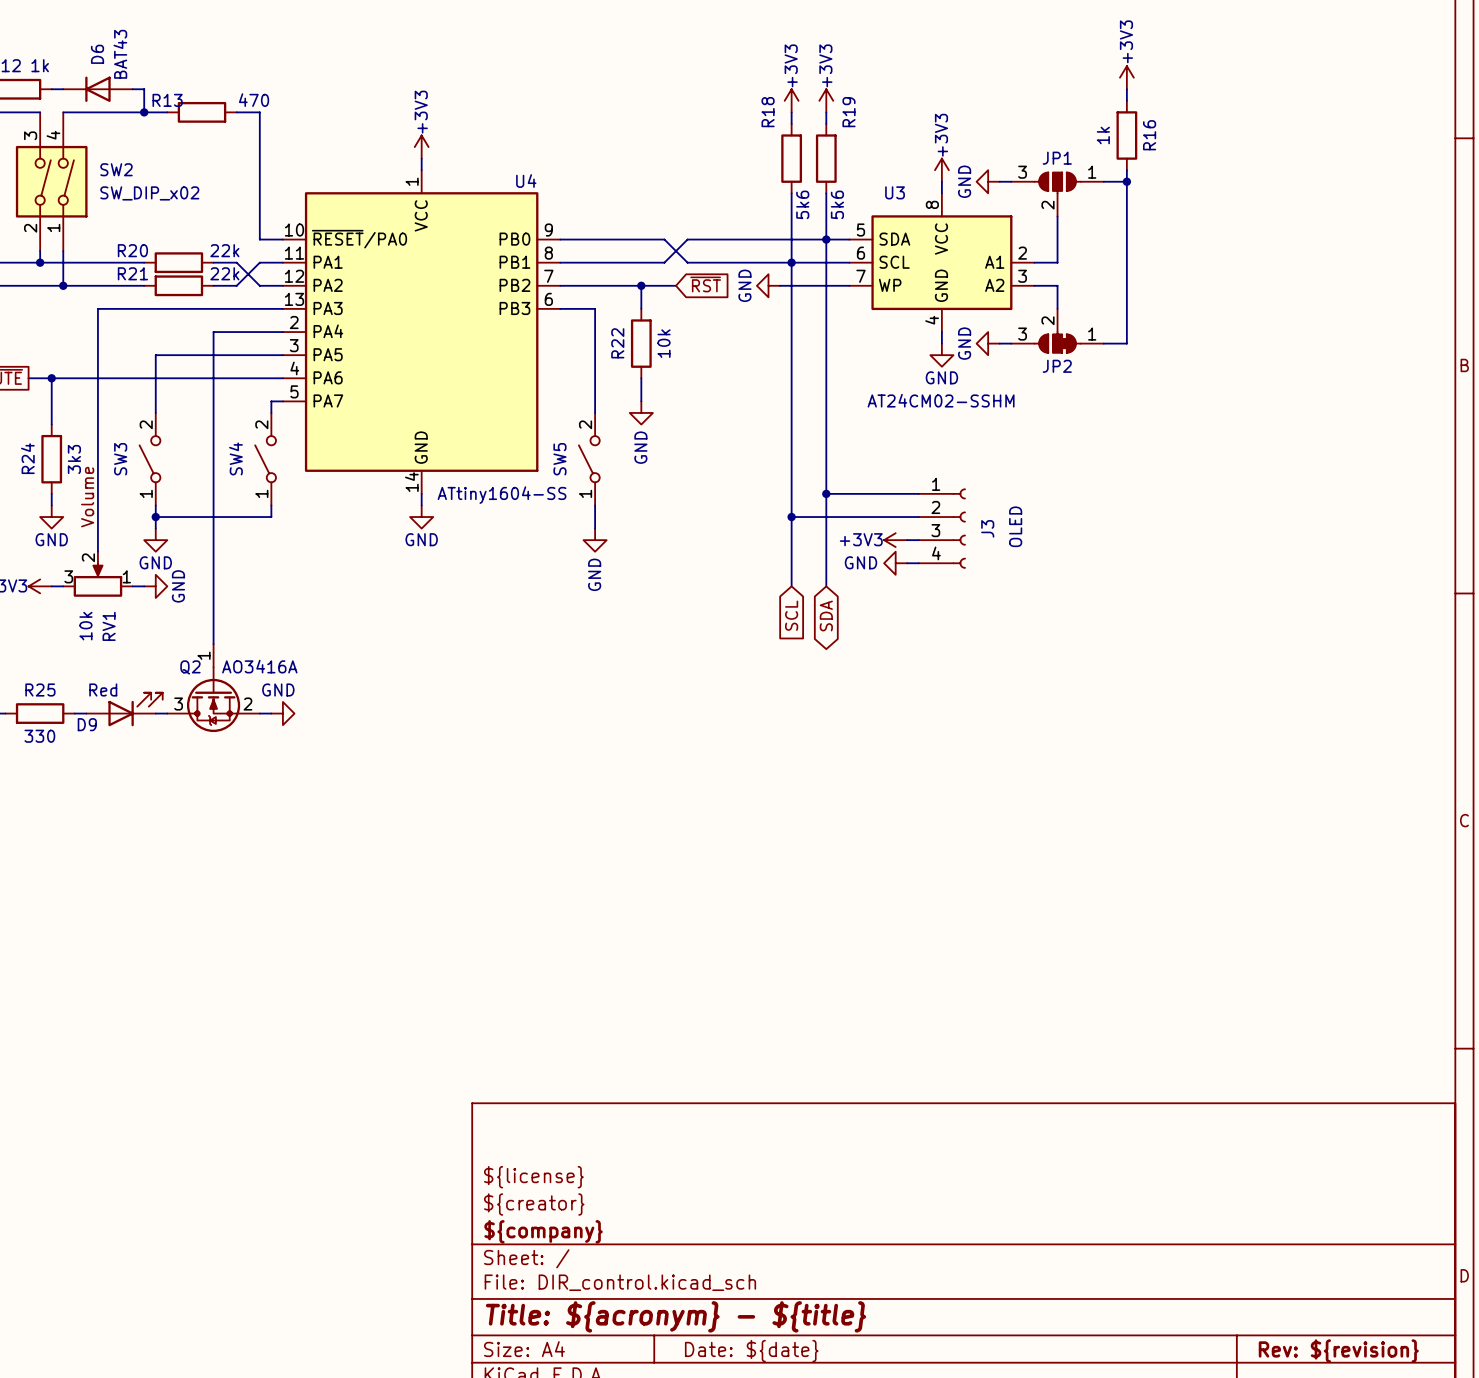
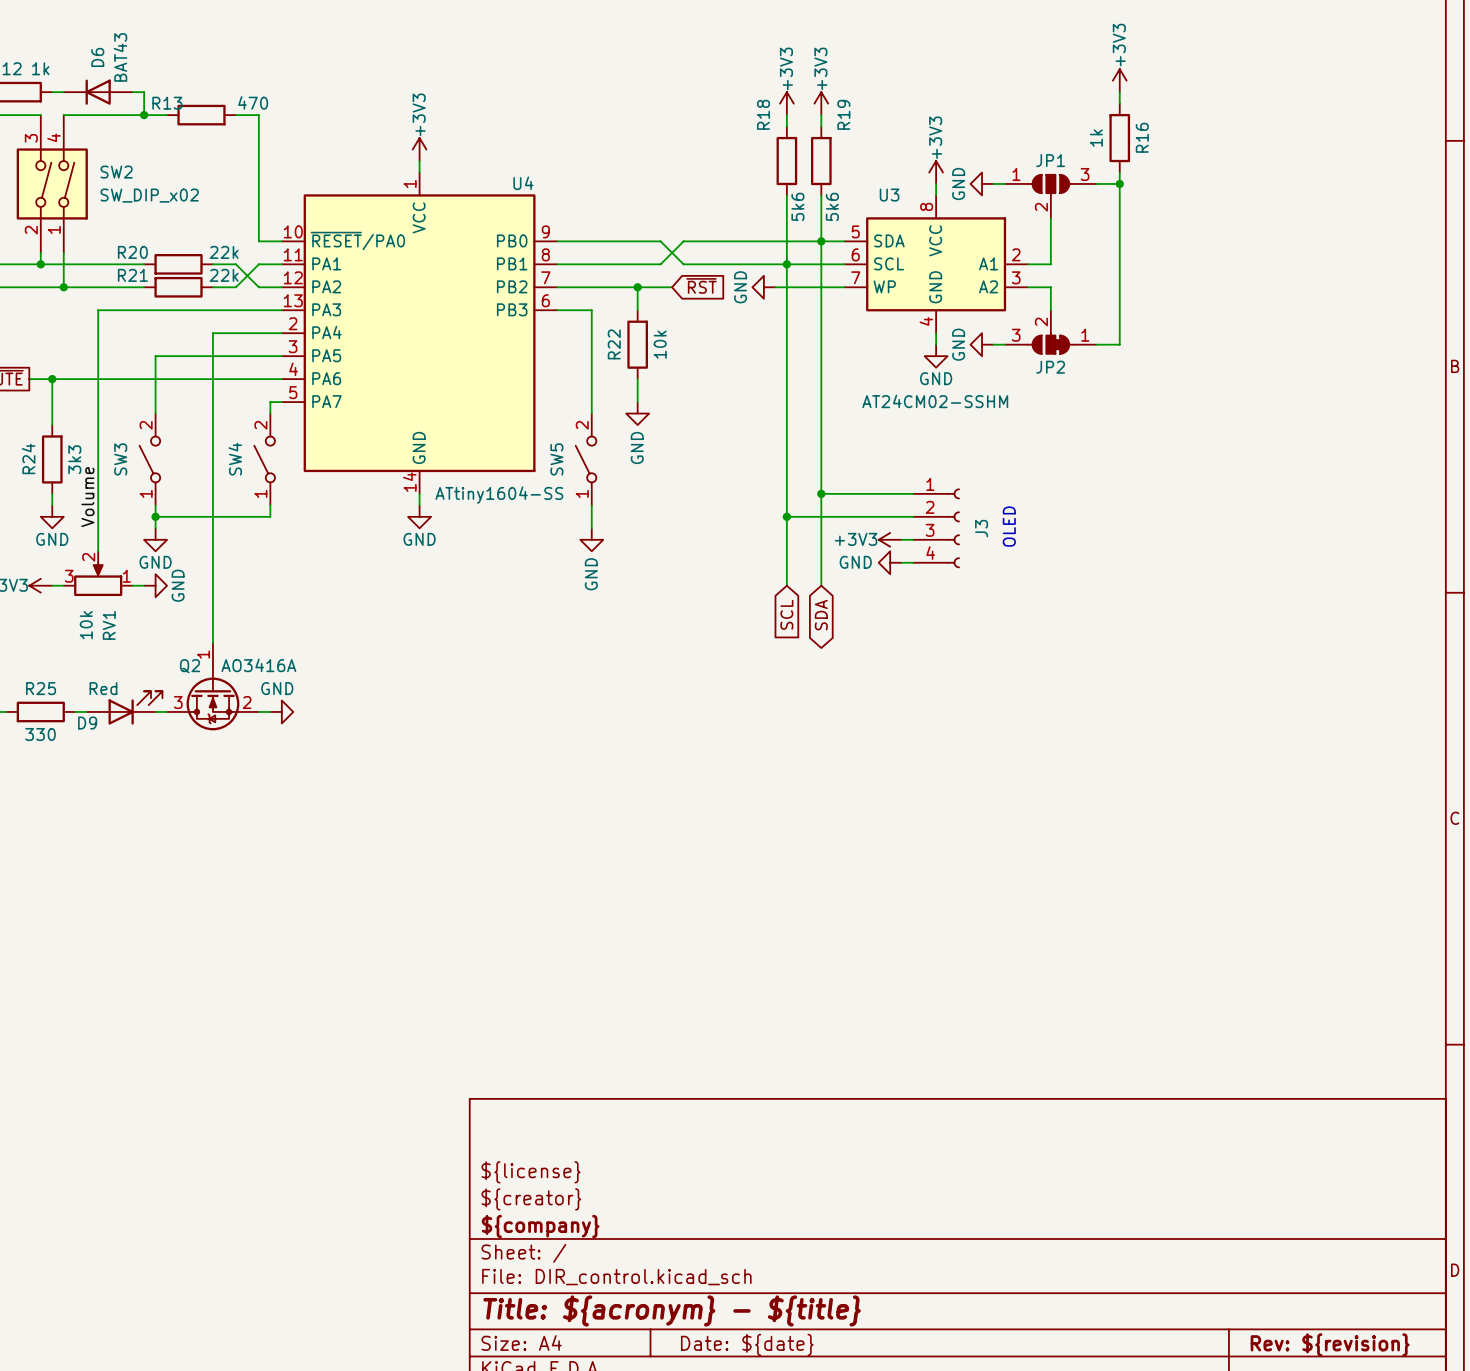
JP1 flip: as is (1057, 182) -> left-right (1050, 185)

